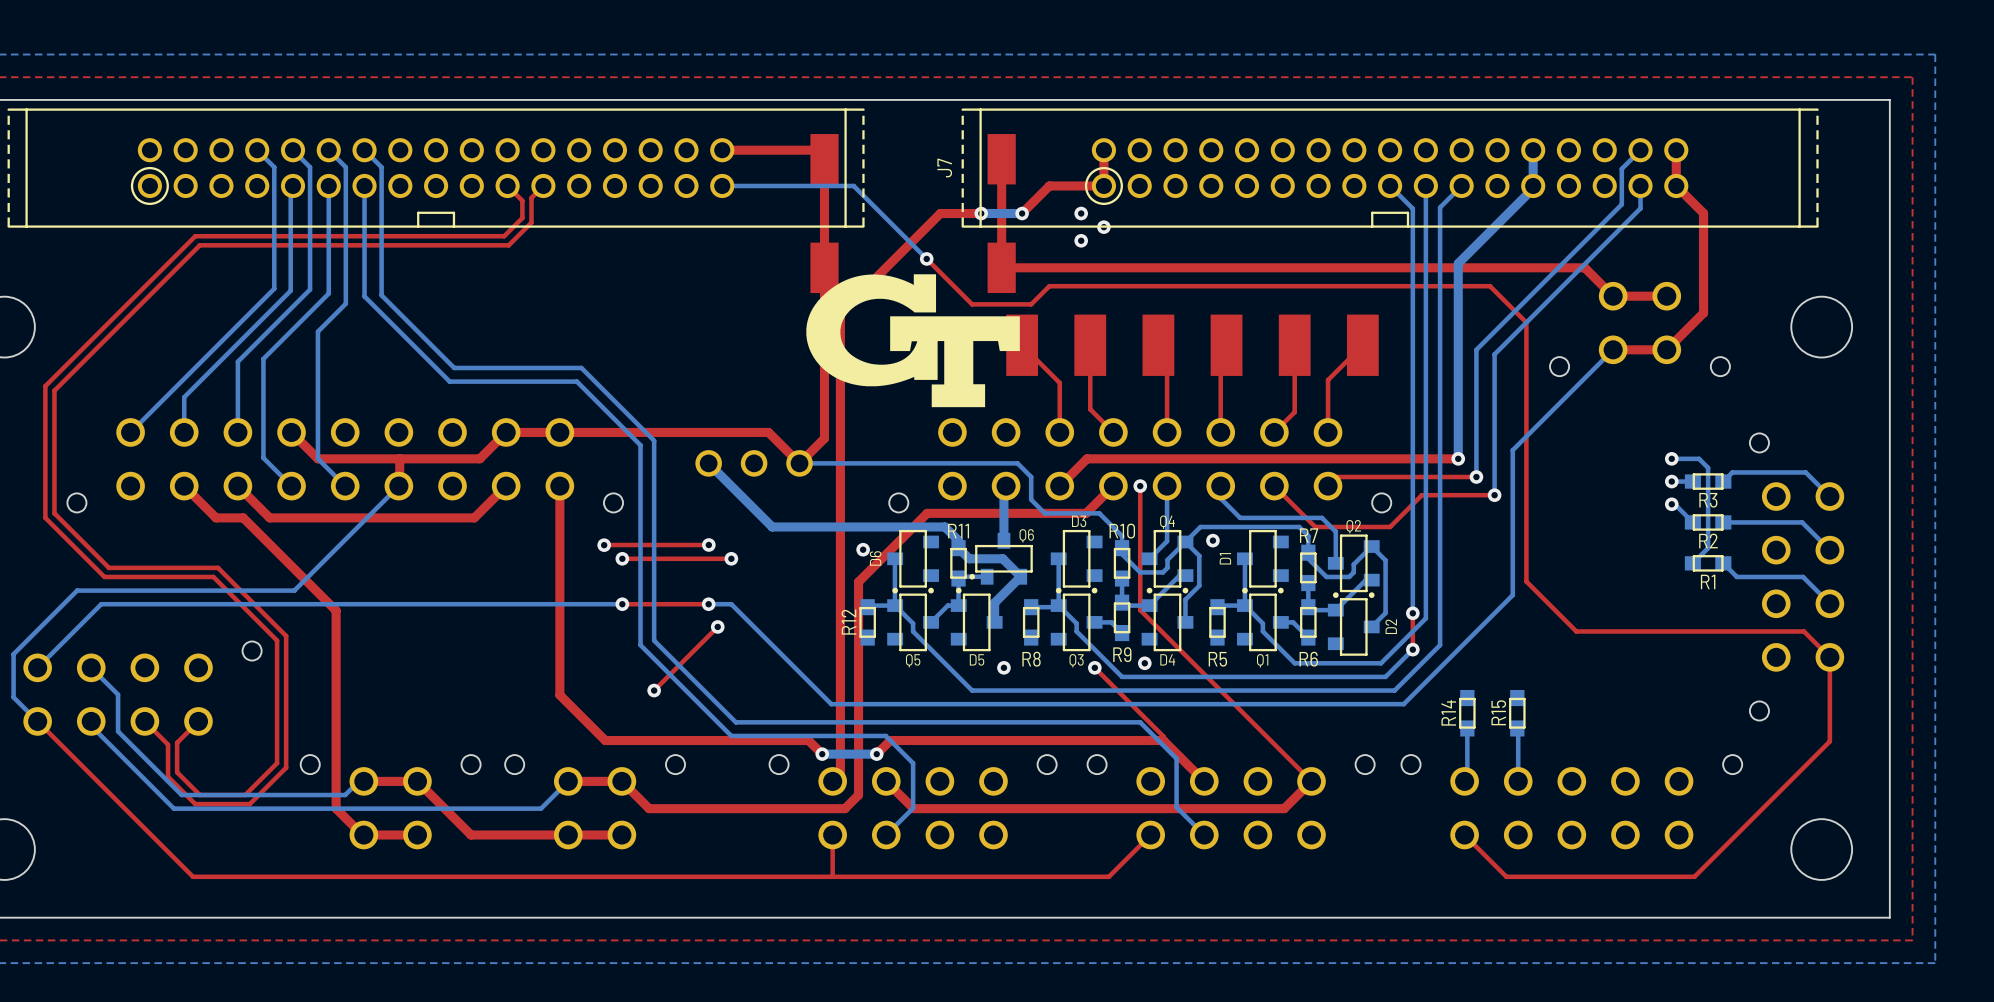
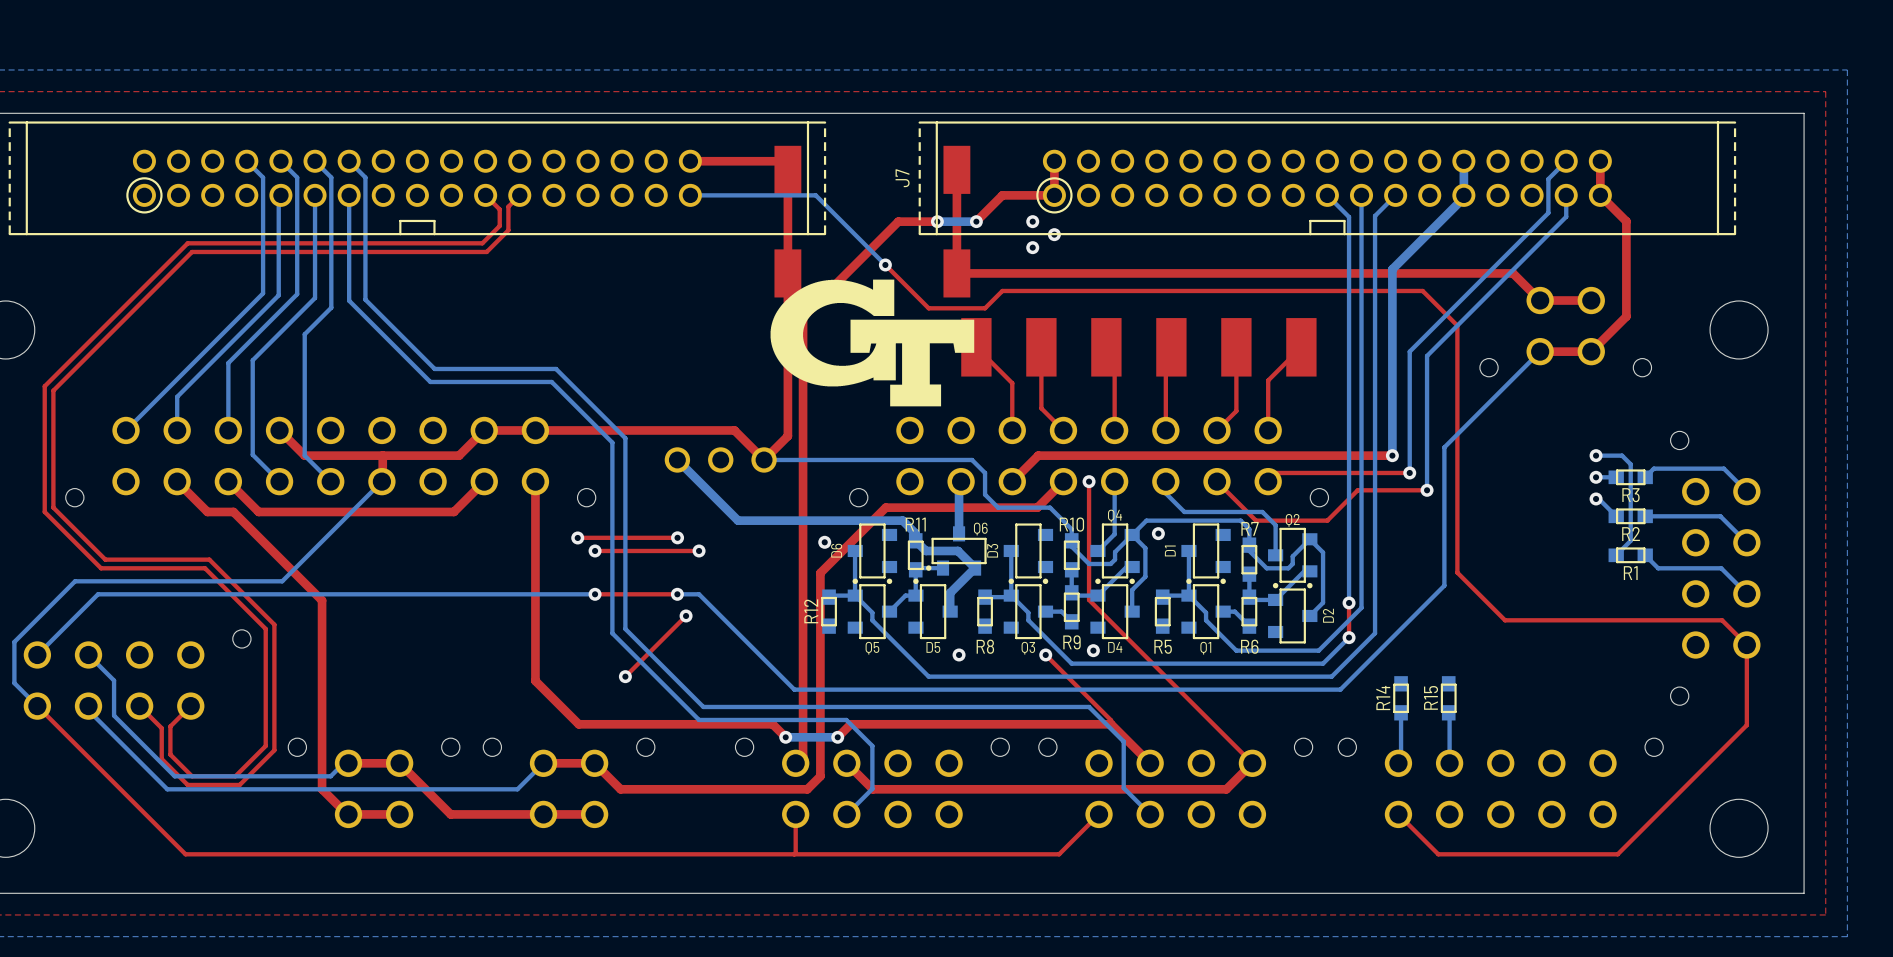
D3 name rotation: 0° (1079, 521) -> 90° counterclockwise (992, 550)
D3 name position: D3 (1079, 521) -> D3 (992, 550)

